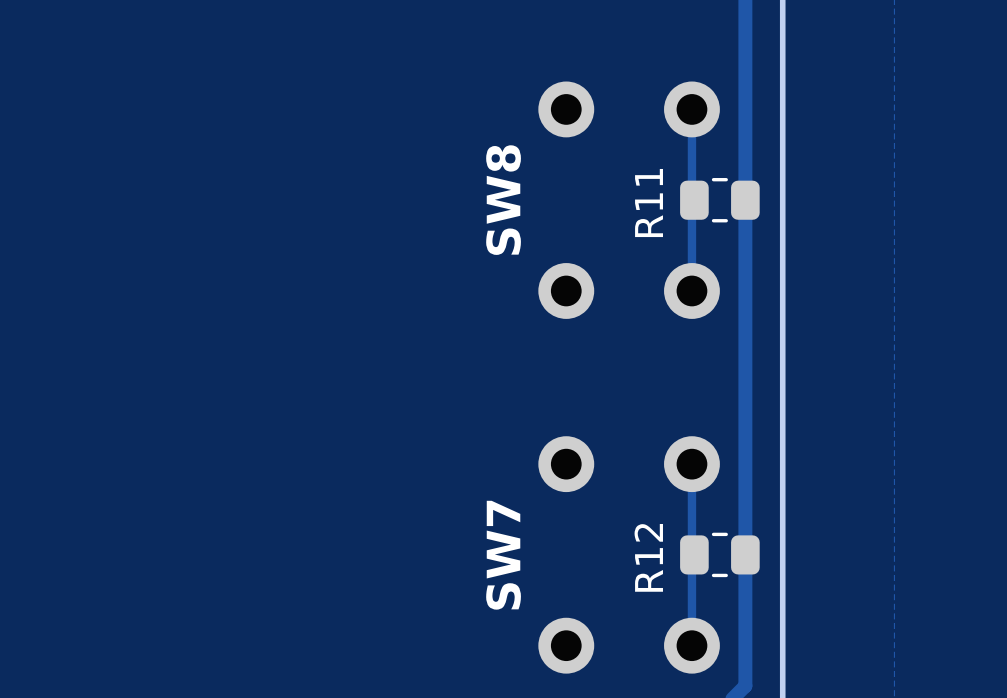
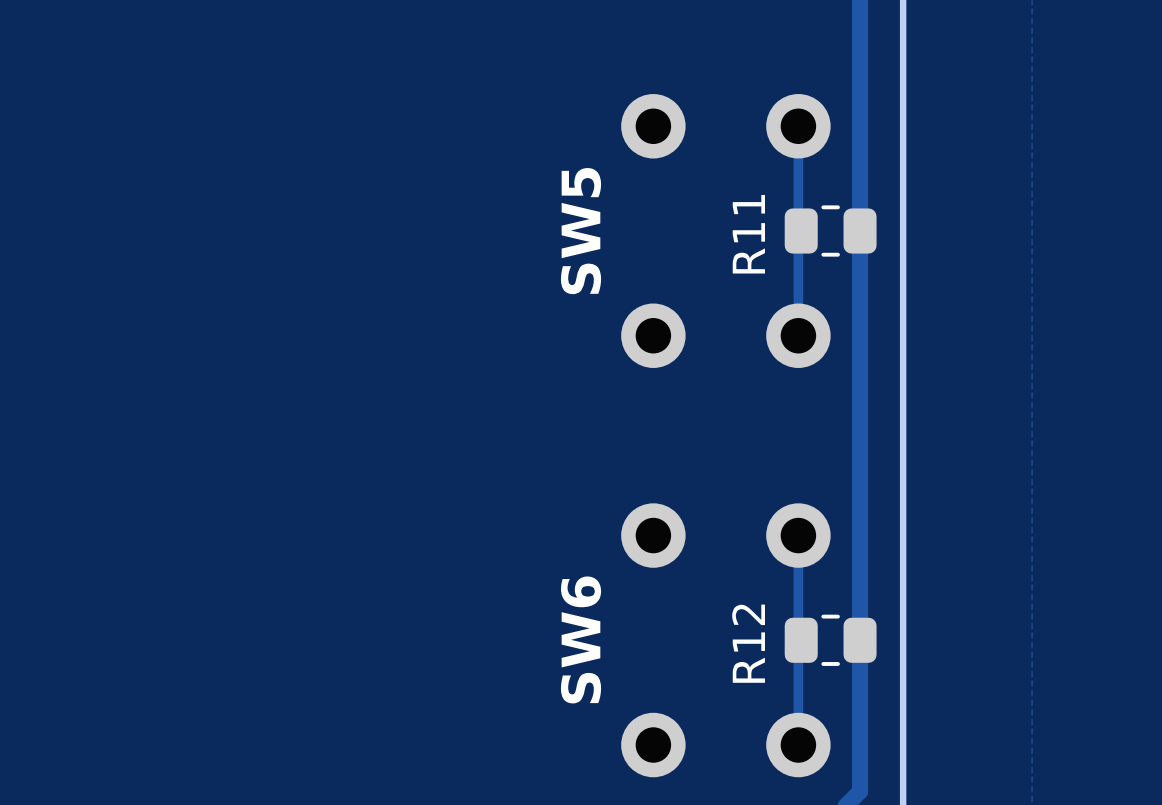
text: SW8 (503, 200) -> SW5 (581, 231)
text: SW7 (503, 555) -> SW6 (581, 639)

